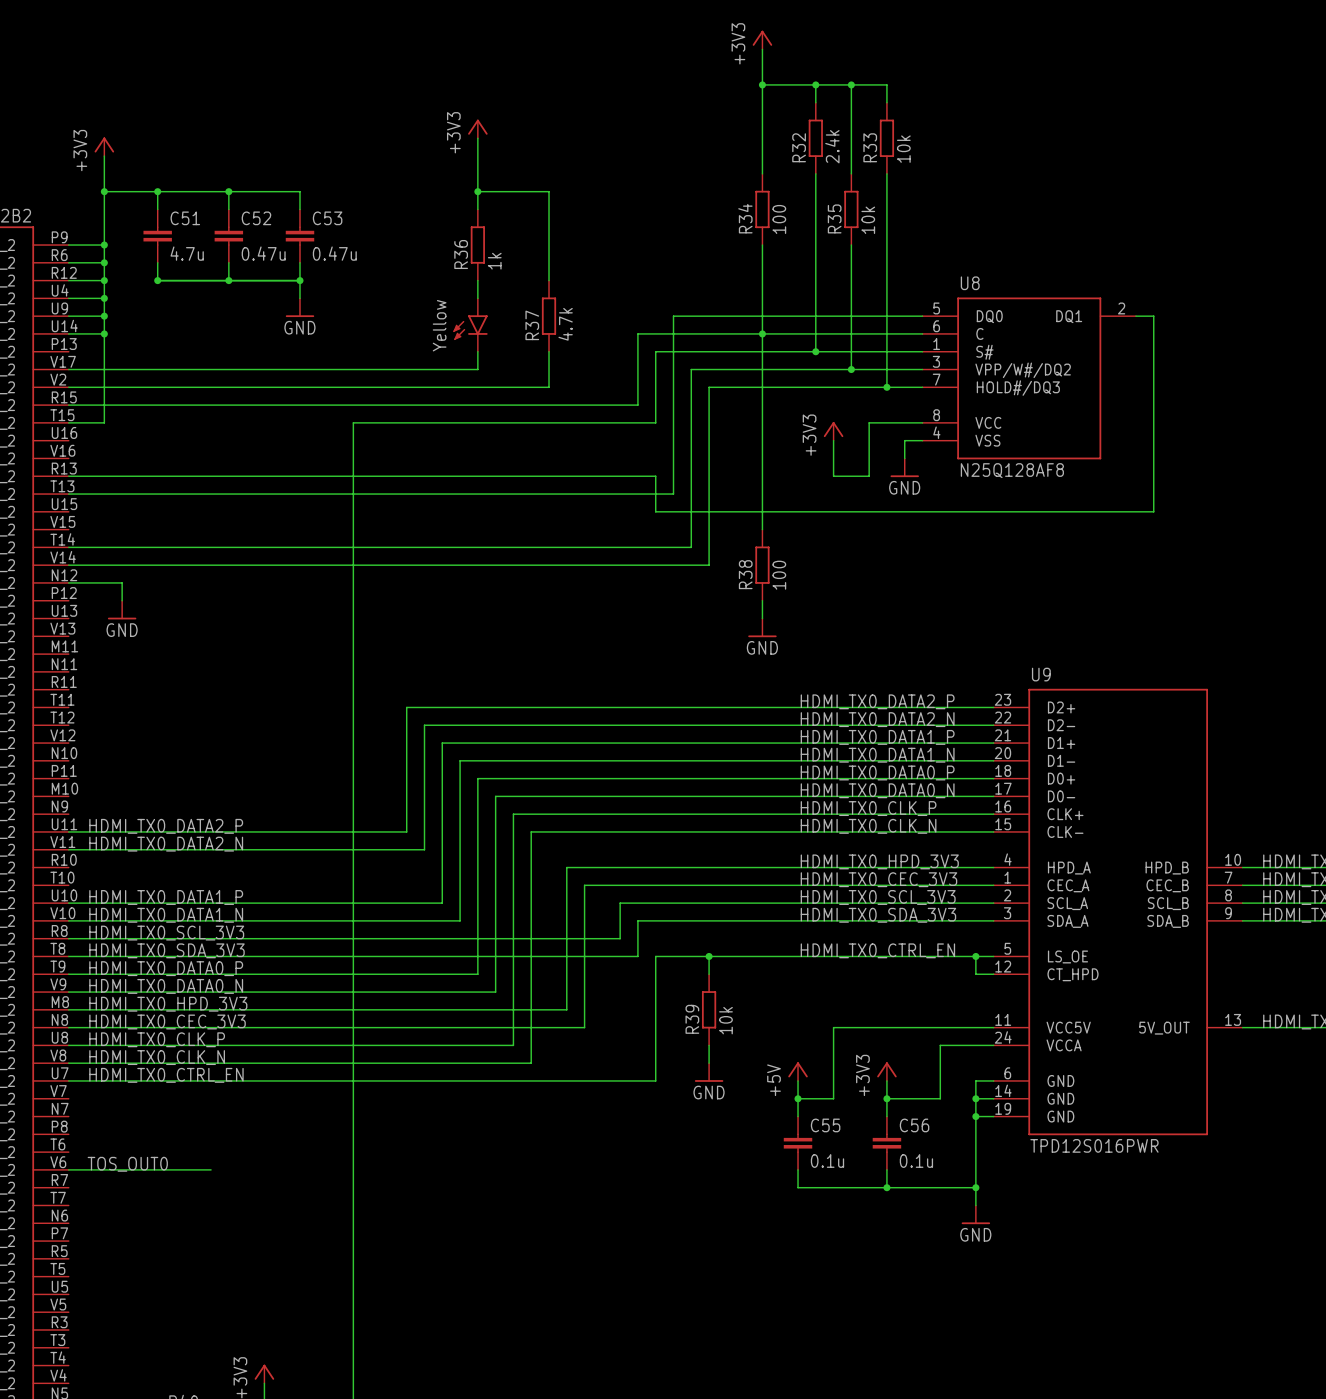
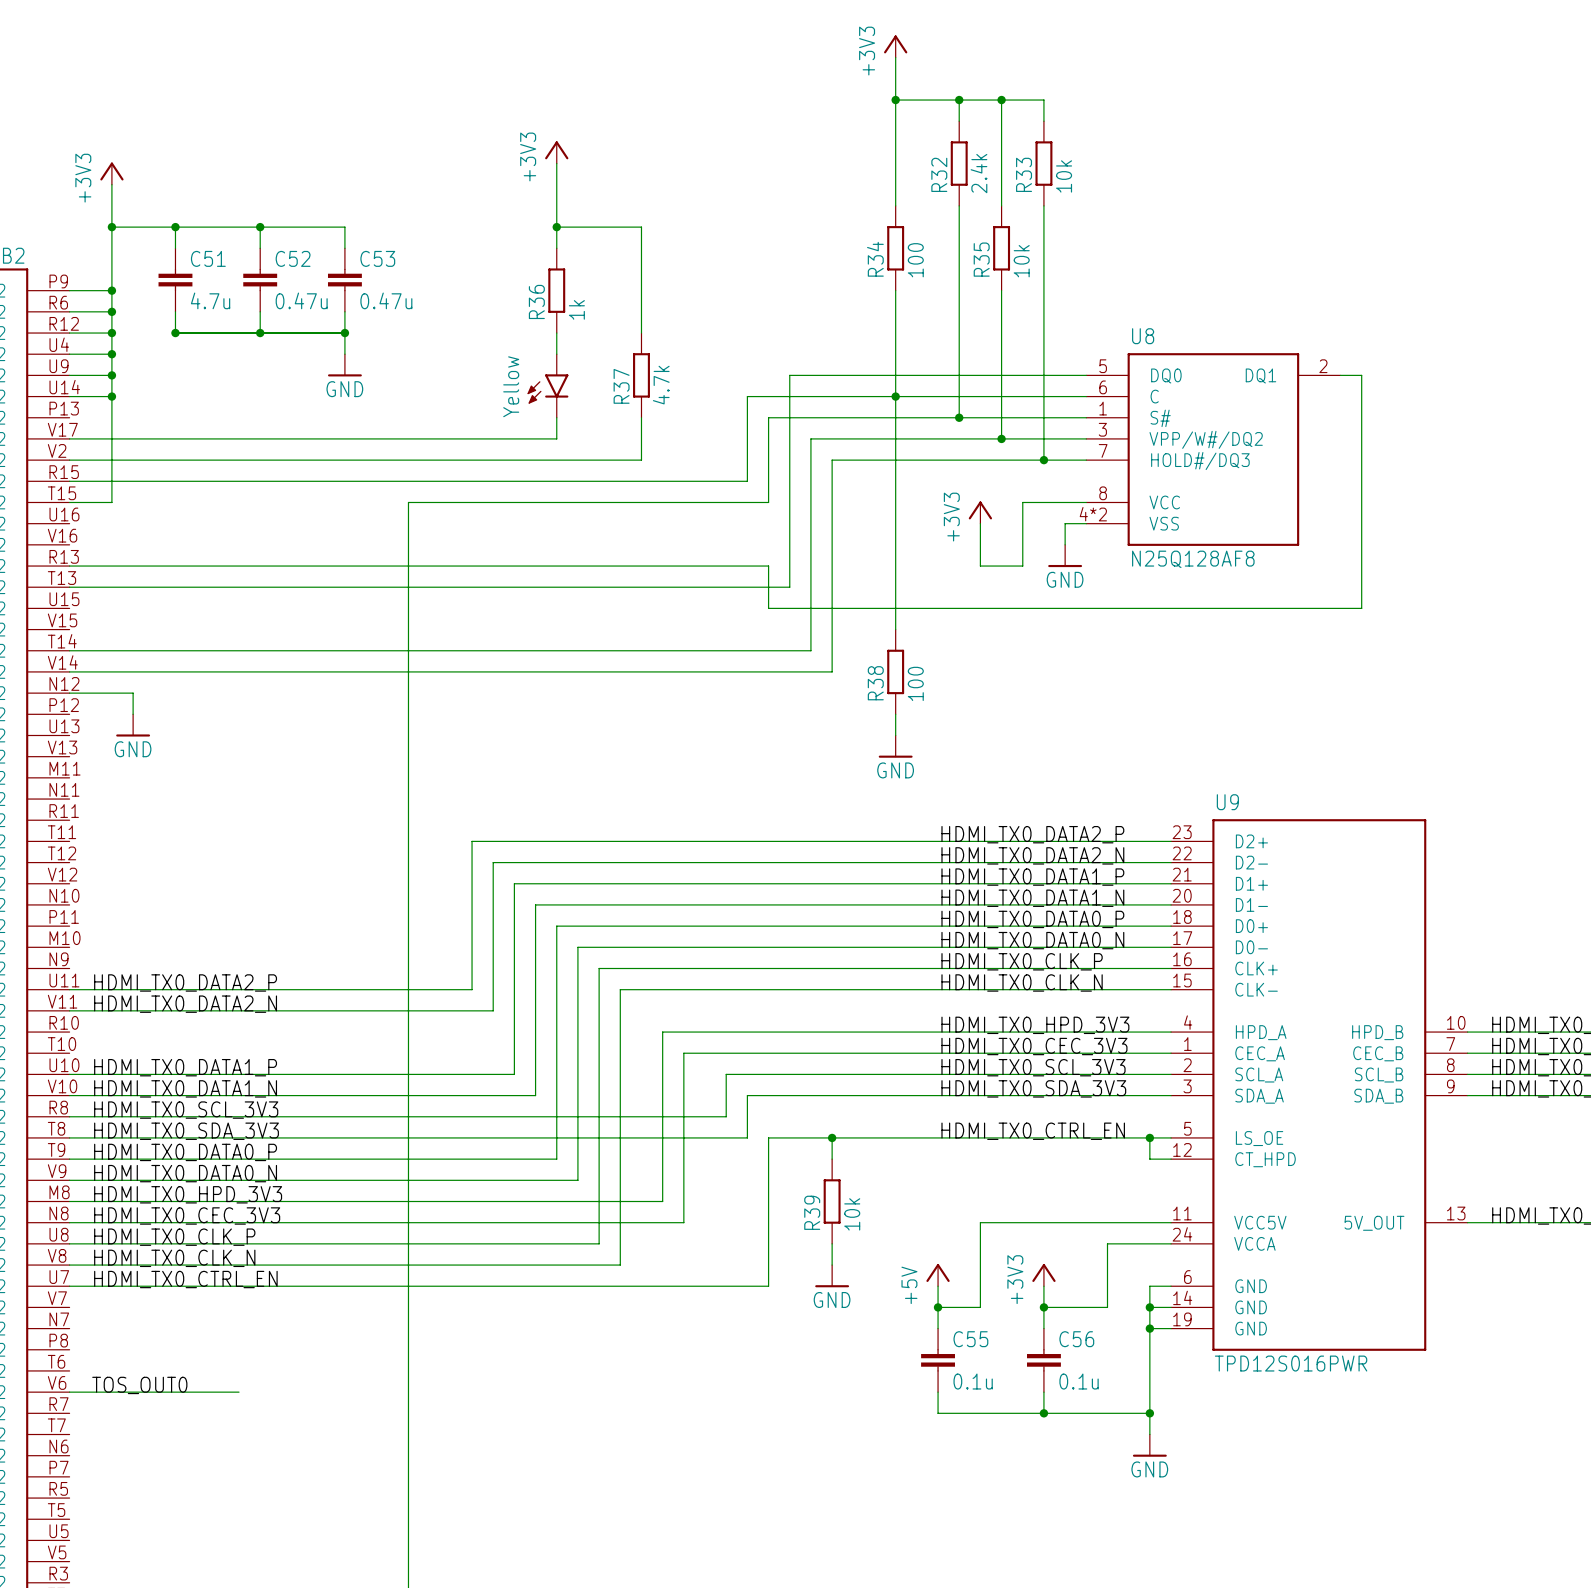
U8 pin number: 4 (936, 432) -> 4*2 (1093, 514)

